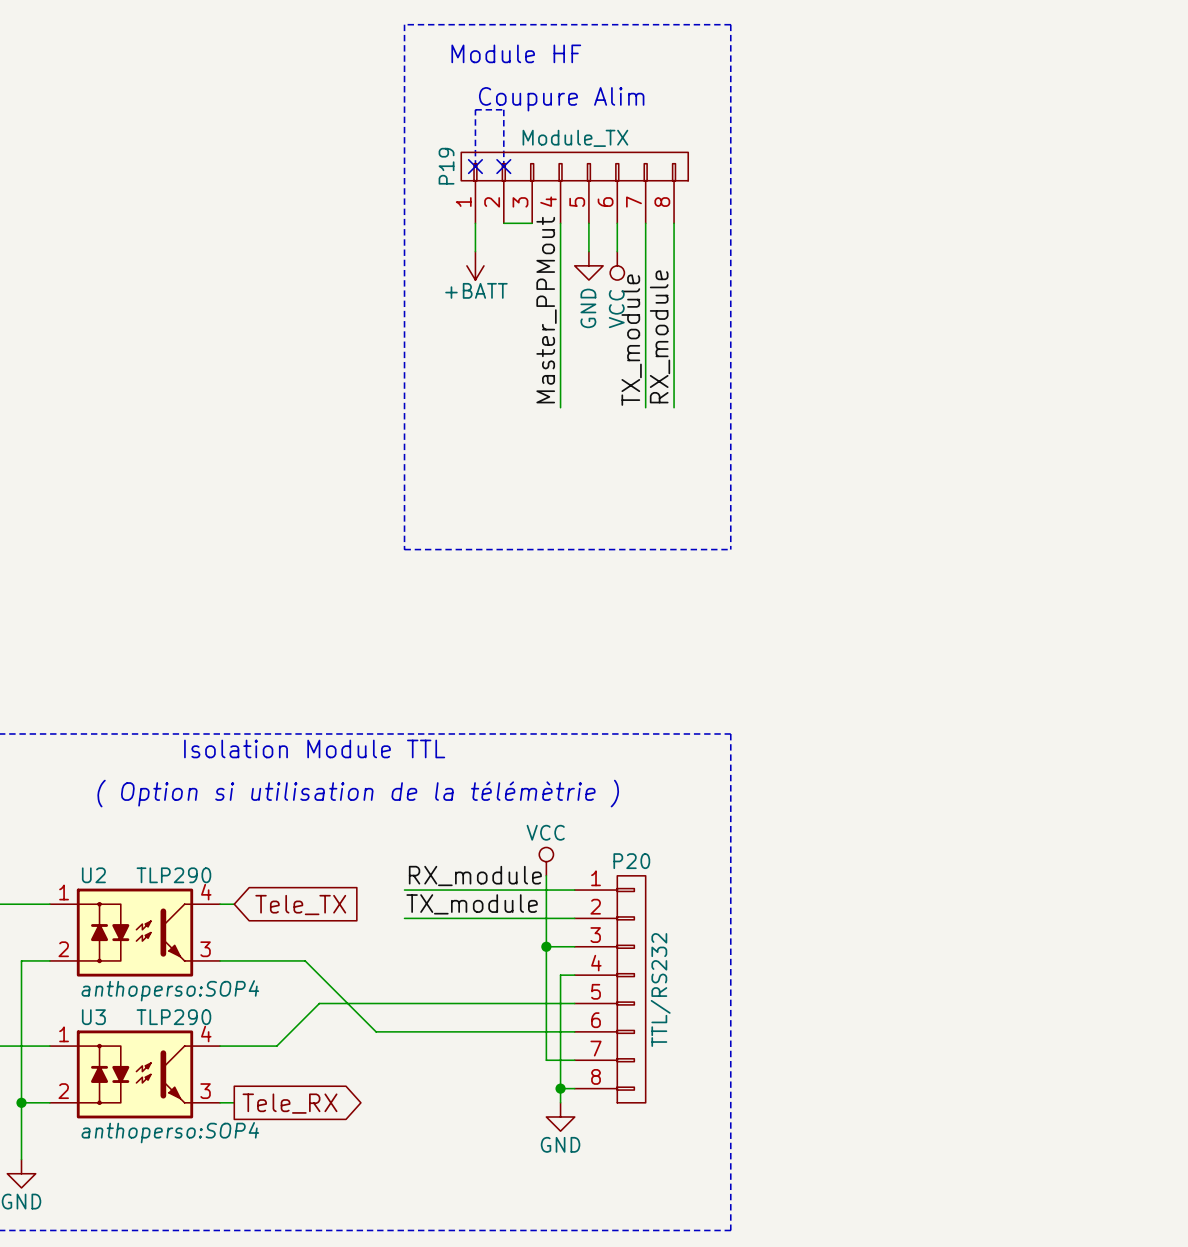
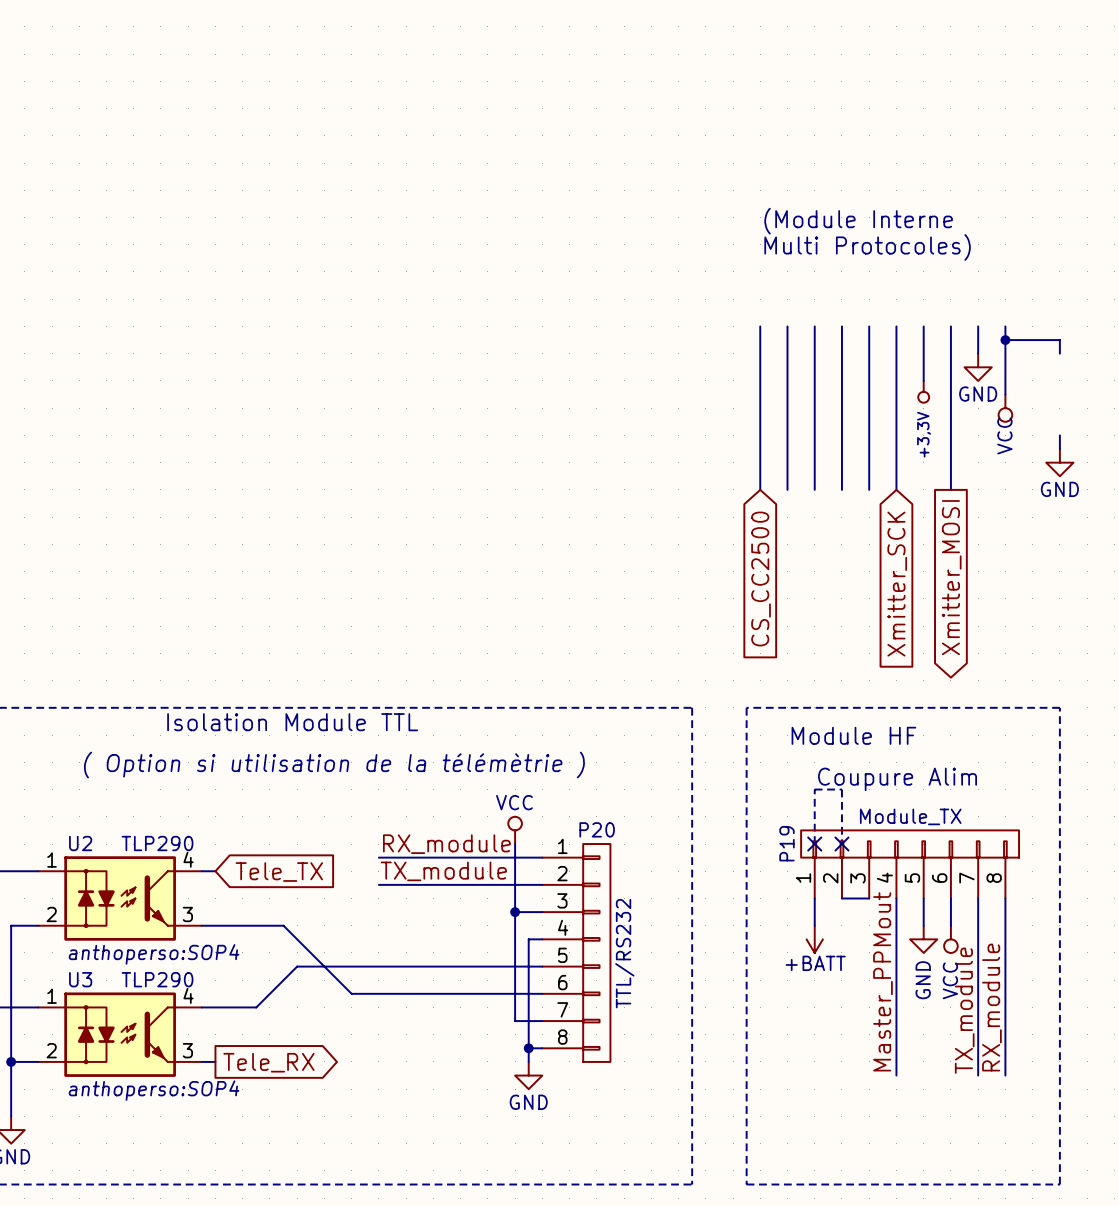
line: (404, 24) (730, 24) (730, 549) (404, 549) (404, 24) -> none
text: Module HF (516, 53) -> none
text: Coupure Alim (561, 99) -> none
line: (475, 166) (475, 109) (503, 109) (503, 166) -> none
no-connect mark: (475, 166) -> none
no-connect mark: (503, 166) -> none
P19 position: (574, 187) -> (910, 864)
wire: (475, 223) (475, 251) -> none
wire: (503, 223) (532, 223) -> none
wire: (560, 223) (560, 407) -> none
wire: (588, 223) (588, 251) -> none
wire: (617, 223) (617, 251) -> none
wire: (645, 223) (645, 407) -> none
wire: (674, 223) (674, 407) -> none
text: none -> (Module Interne (858, 221)
text: none -> Multi Protocoles) (867, 247)
power symbol: +BATT (475, 265) -> none
power symbol: GND (588, 265) -> none
power symbol: VCC (617, 265) -> none
label: Master_PPMout (546, 310) -> none
label: RX_module (660, 336) -> none
wire: none -> (760, 326) (760, 489)
wire: none -> (787, 326) (787, 489)
wire: none -> (814, 326) (814, 489)
wire: none -> (841, 326) (841, 489)
wire: none -> (869, 326) (869, 489)
wire: none -> (896, 326) (896, 489)
wire: none -> (923, 326) (923, 380)
wire: none -> (950, 326) (950, 489)
wire: none -> (978, 326) (978, 353)
wire: none -> (1005, 326) (1005, 394)
label: TX_module (631, 340) -> none
wire: none -> (1005, 340) (1059, 340) (1059, 353)
junction: none -> (1005, 340)
power symbol: none -> GND (978, 367)
power symbol: none -> +3,3V (923, 391)
power symbol: none -> VCC (1005, 408)
wire: none -> (1059, 435) (1059, 449)
power symbol: none -> GND (1059, 462)
global label: none -> Xmitter_MOSI (951, 577)
global label: none -> CS_CC2500 (761, 579)
global label: none -> Xmitter_SCK (897, 584)
line: none -> (746, 707) (1059, 707) (1059, 1184) (746, 1184) (746, 707)
text: none -> Module HF (853, 735)
text: none -> Coupure Alim (897, 779)
line: none -> (814, 844) (814, 789) (841, 789) (841, 844)
no-connect mark: none -> (814, 844)
no-connect mark: none -> (841, 844)
wire: none -> (814, 898) (814, 925)
wire: none -> (841, 898) (869, 898)
wire: none -> (896, 898) (896, 1075)
wire: none -> (923, 898) (923, 925)
wire: none -> (950, 898) (950, 925)
wire: none -> (978, 898) (978, 1075)
wire: none -> (1005, 898) (1005, 1075)
power symbol: none -> +BATT (814, 939)
power symbol: none -> GND (923, 939)
power symbol: none -> VCC (950, 939)
label: none -> Master_PPMout (882, 981)
label: none -> RX_module (991, 1007)
label: none -> TX_module (964, 1010)

